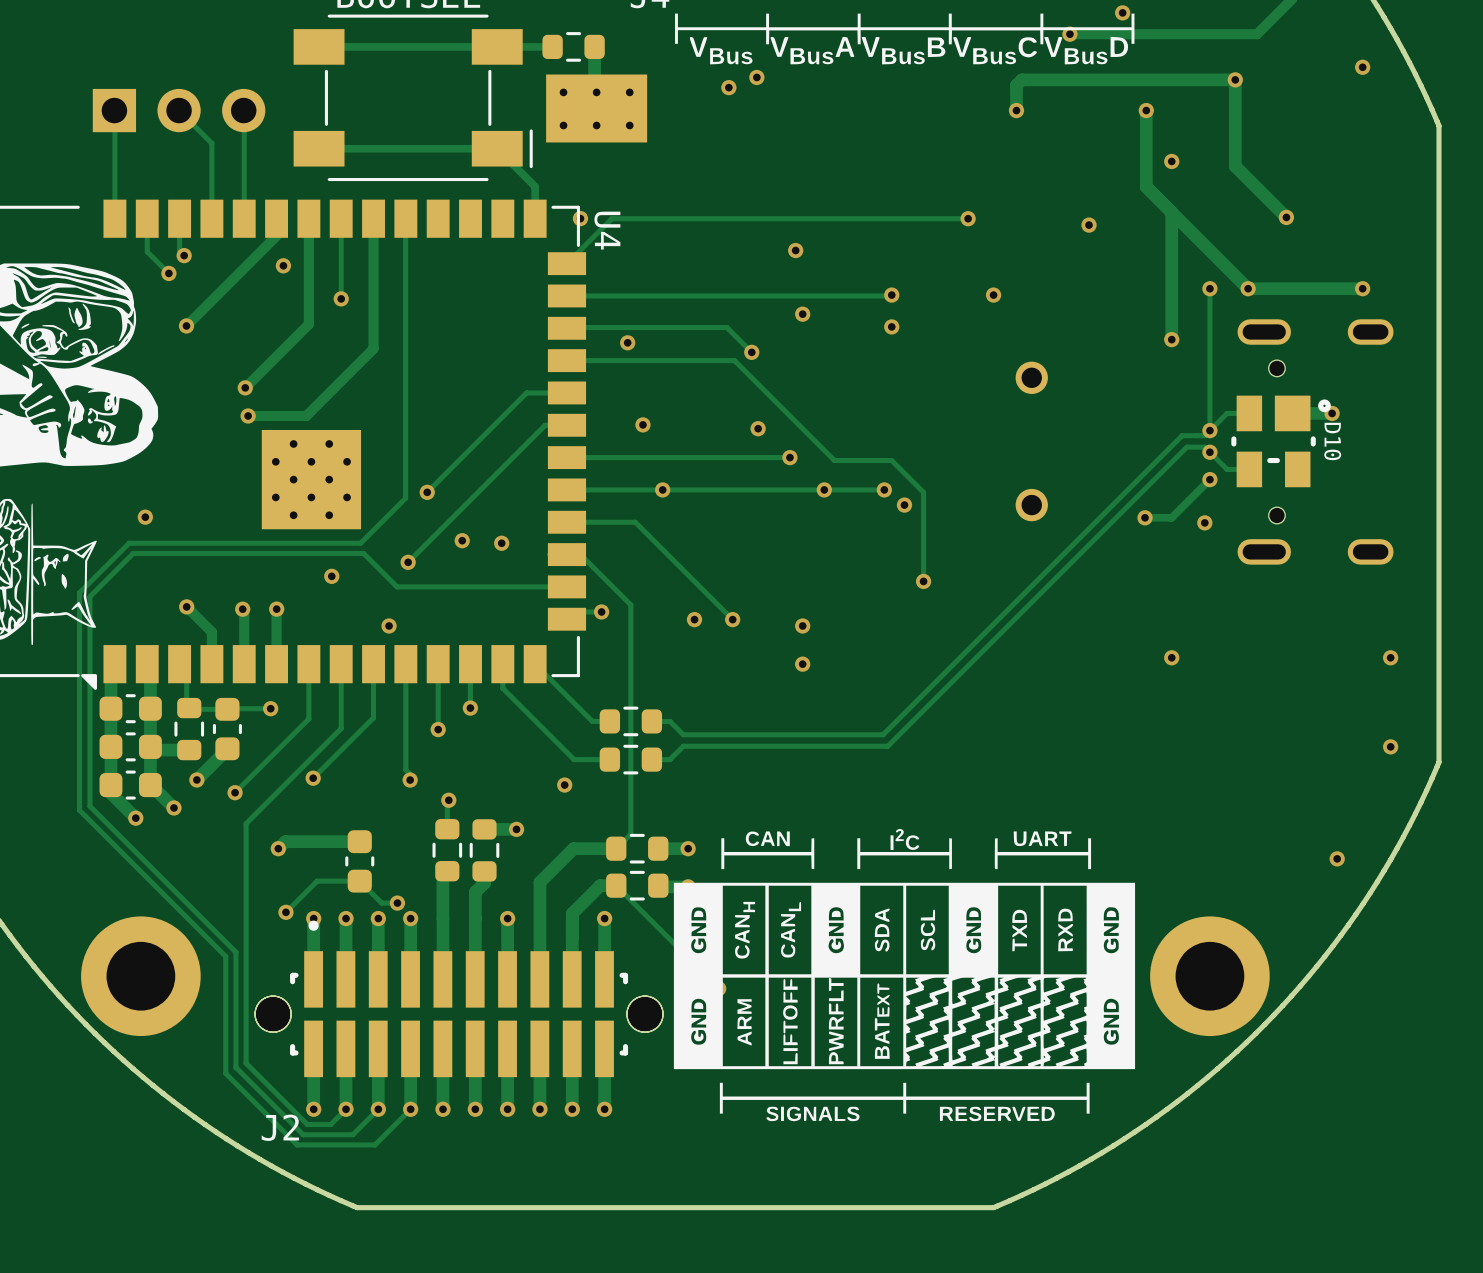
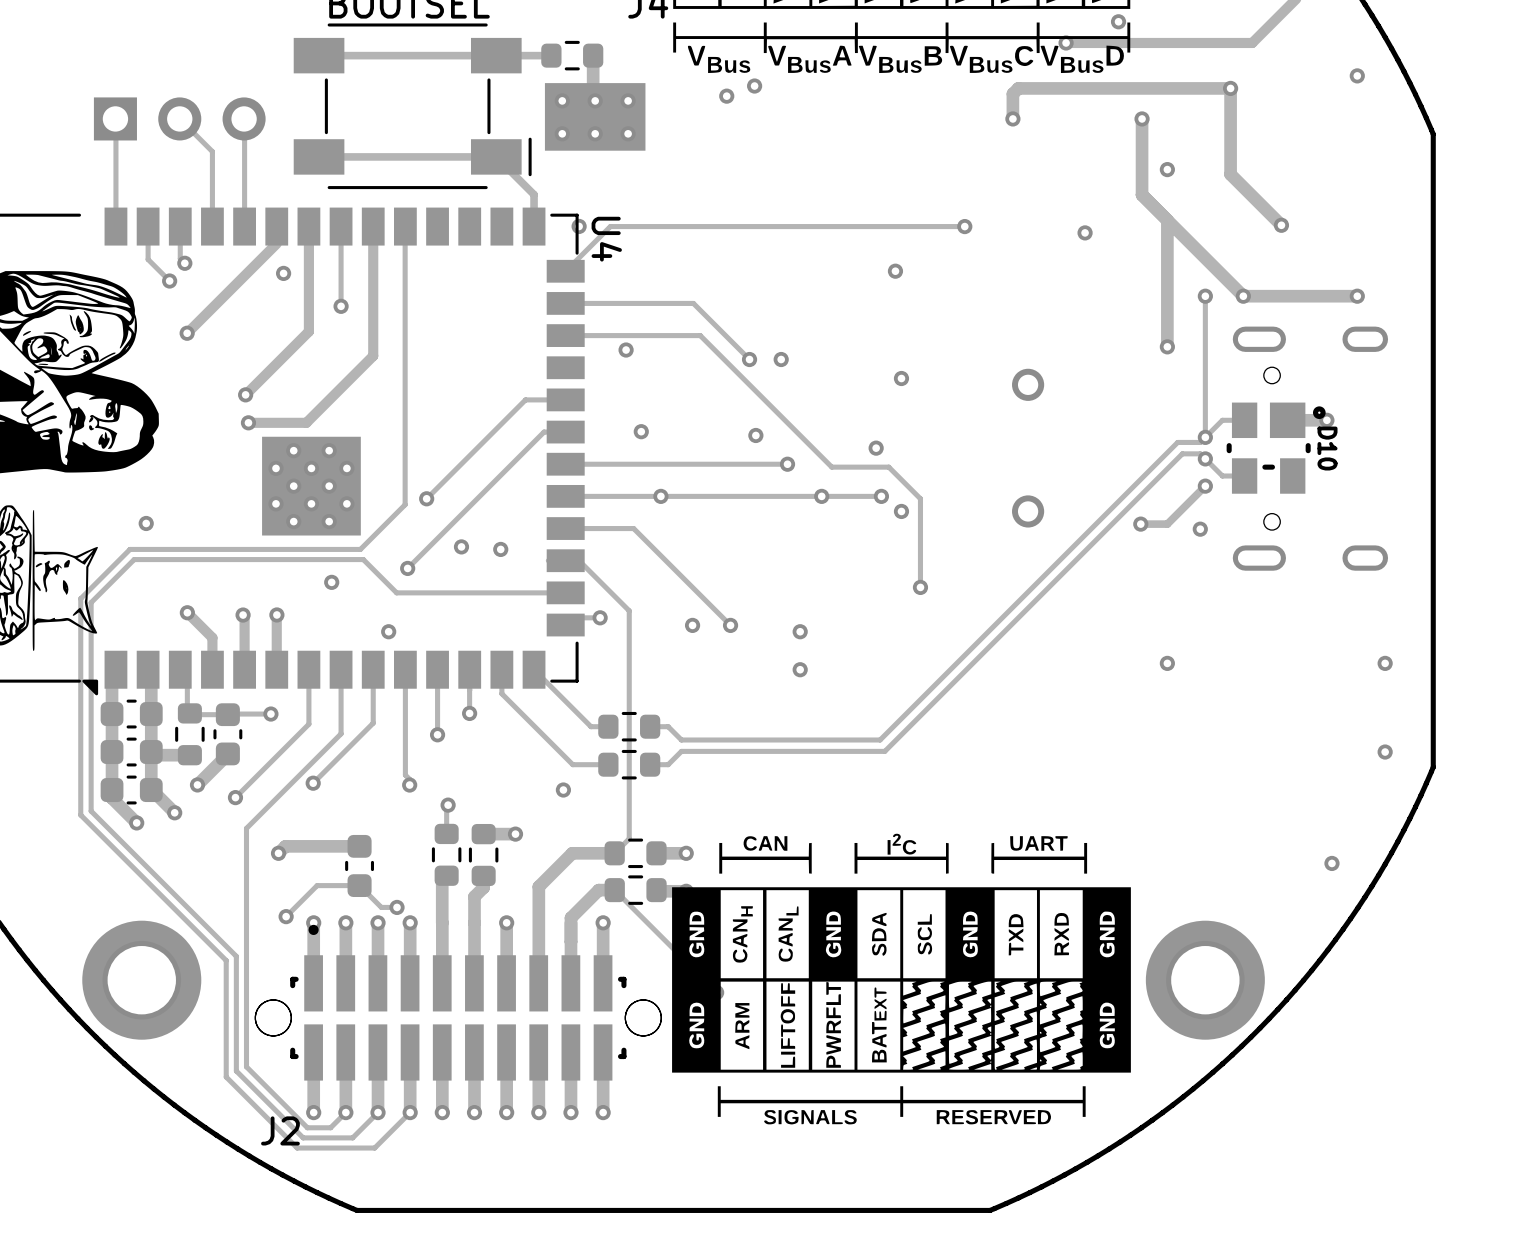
via: (795, 250) -> none
via: none -> (895, 271)
track: (891, 295) (695, 295) -> none
via: (891, 295) -> none
via: (993, 295) -> none
via position: (802, 314) -> (781, 359)
via: (891, 326) -> none
track: (726, 327) (566, 328) -> (724, 334) (693, 303)
track: (734, 360) (566, 360) -> (732, 367) (700, 335) (565, 335)
via: none -> (901, 378)
via: none -> (876, 448)

